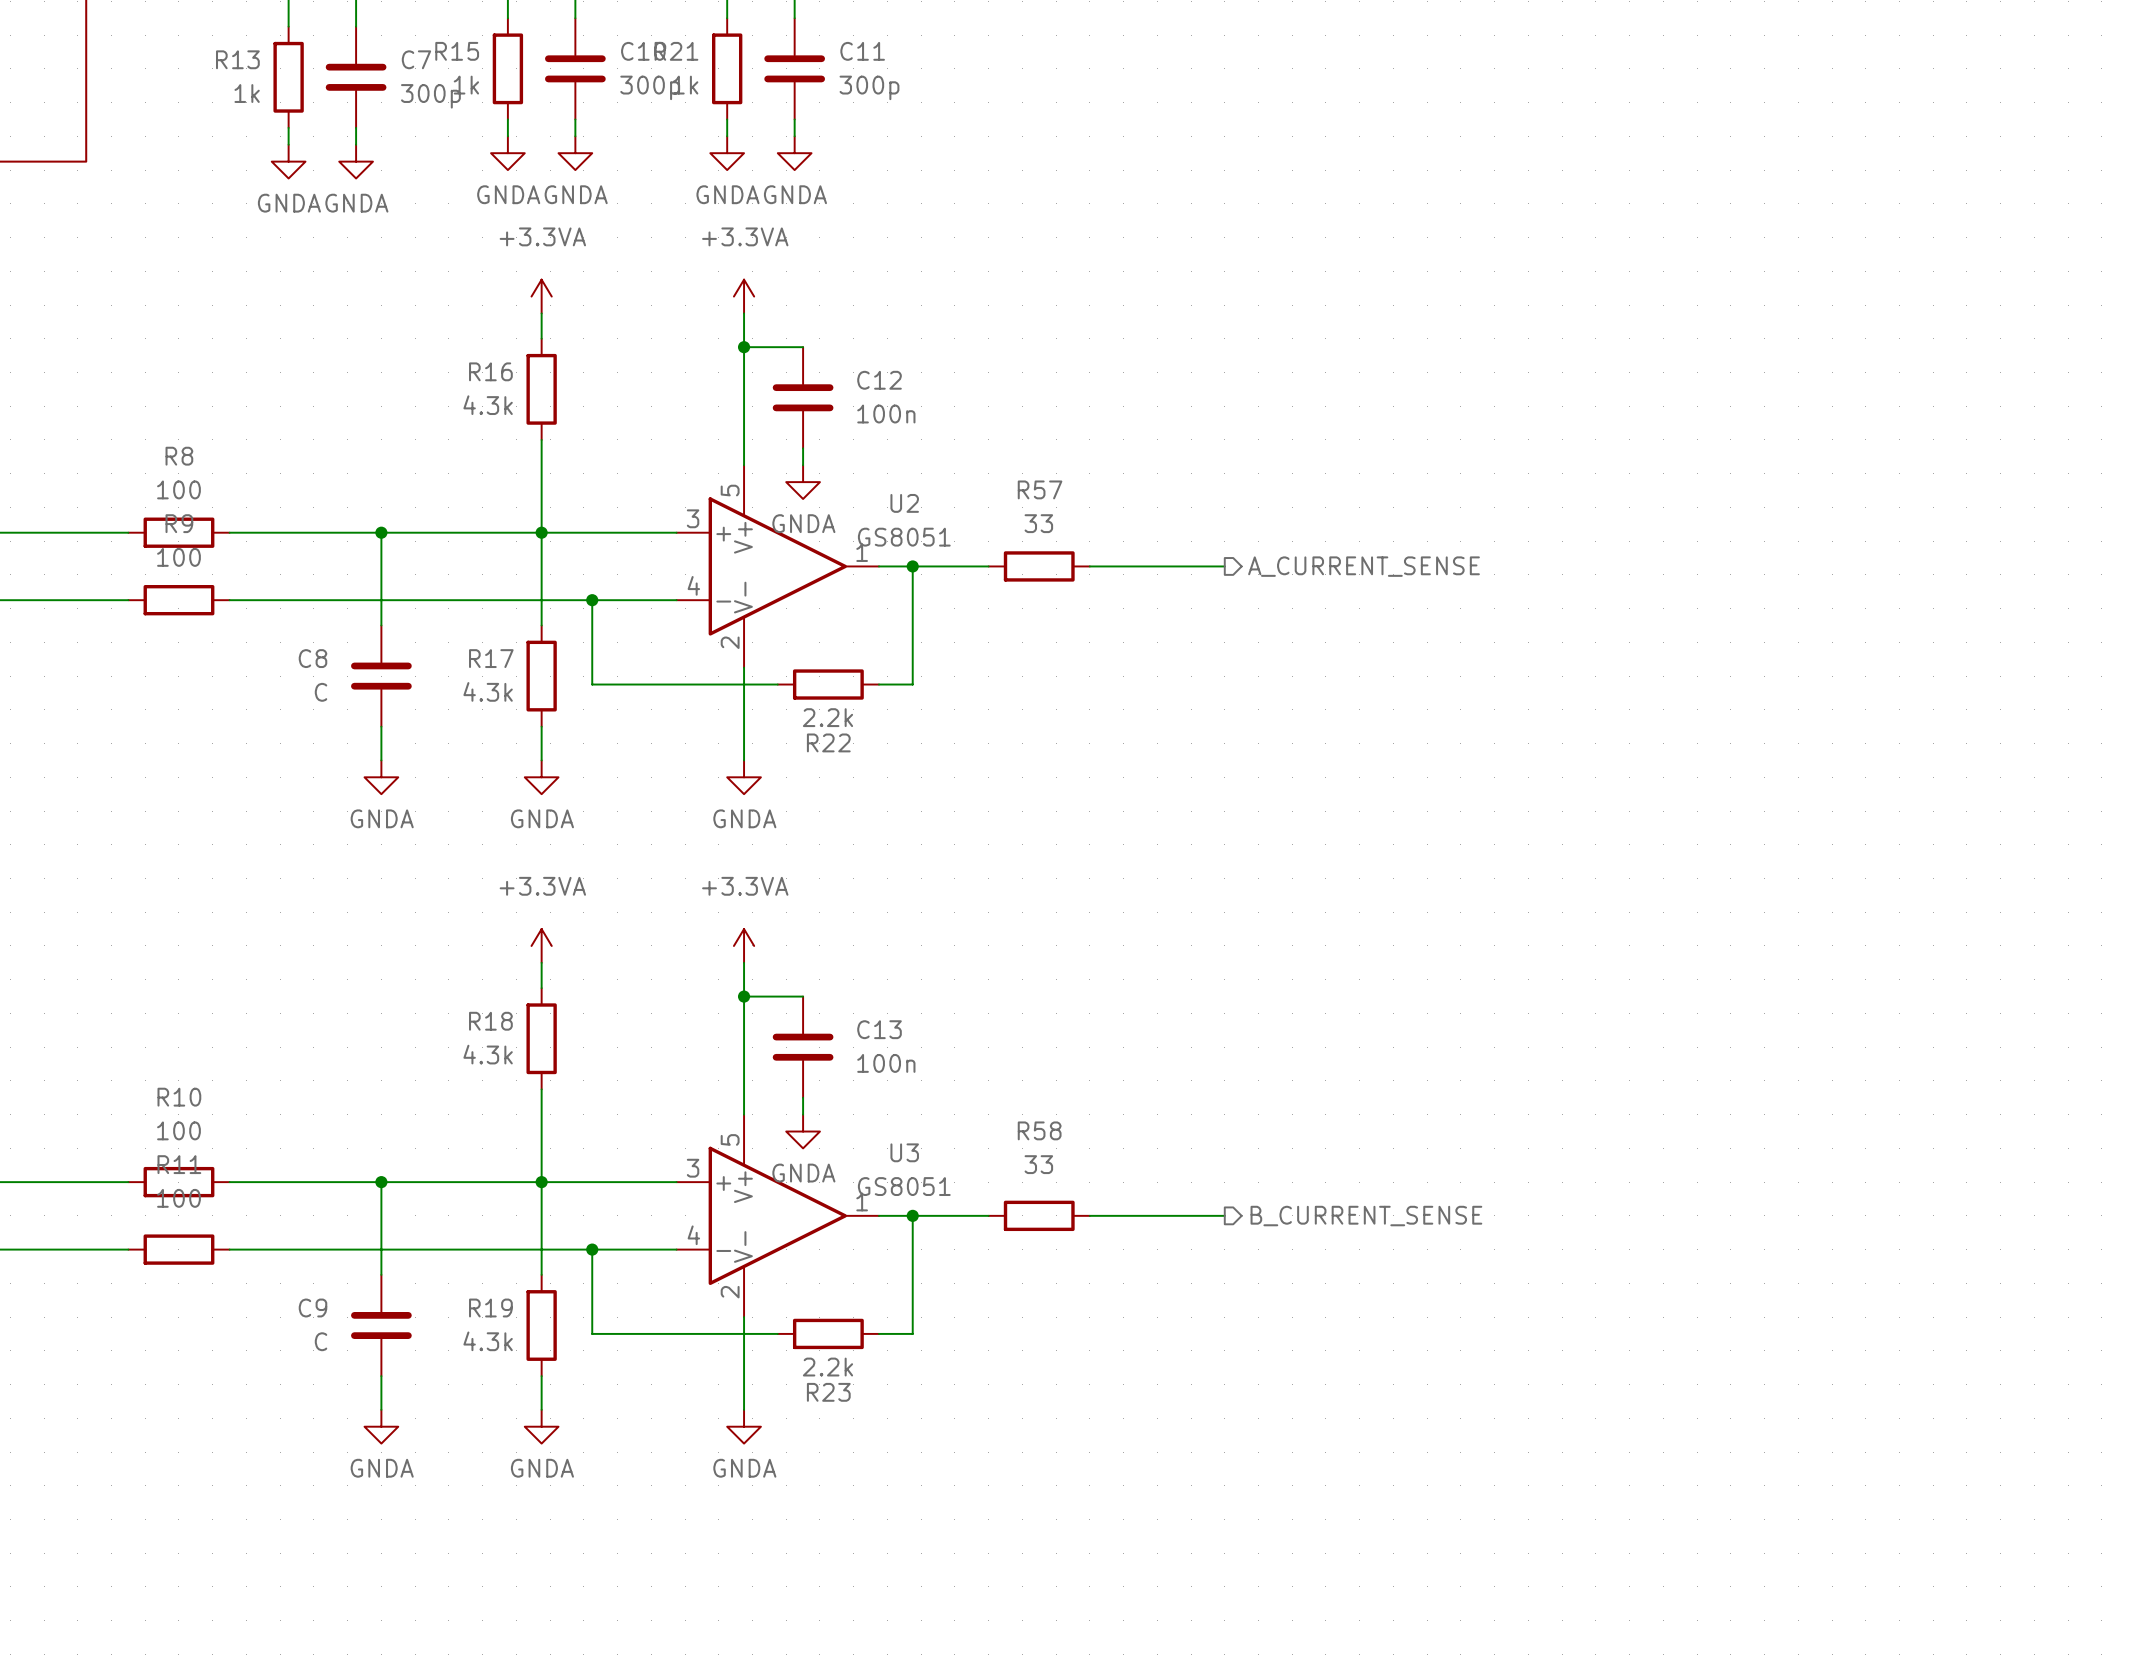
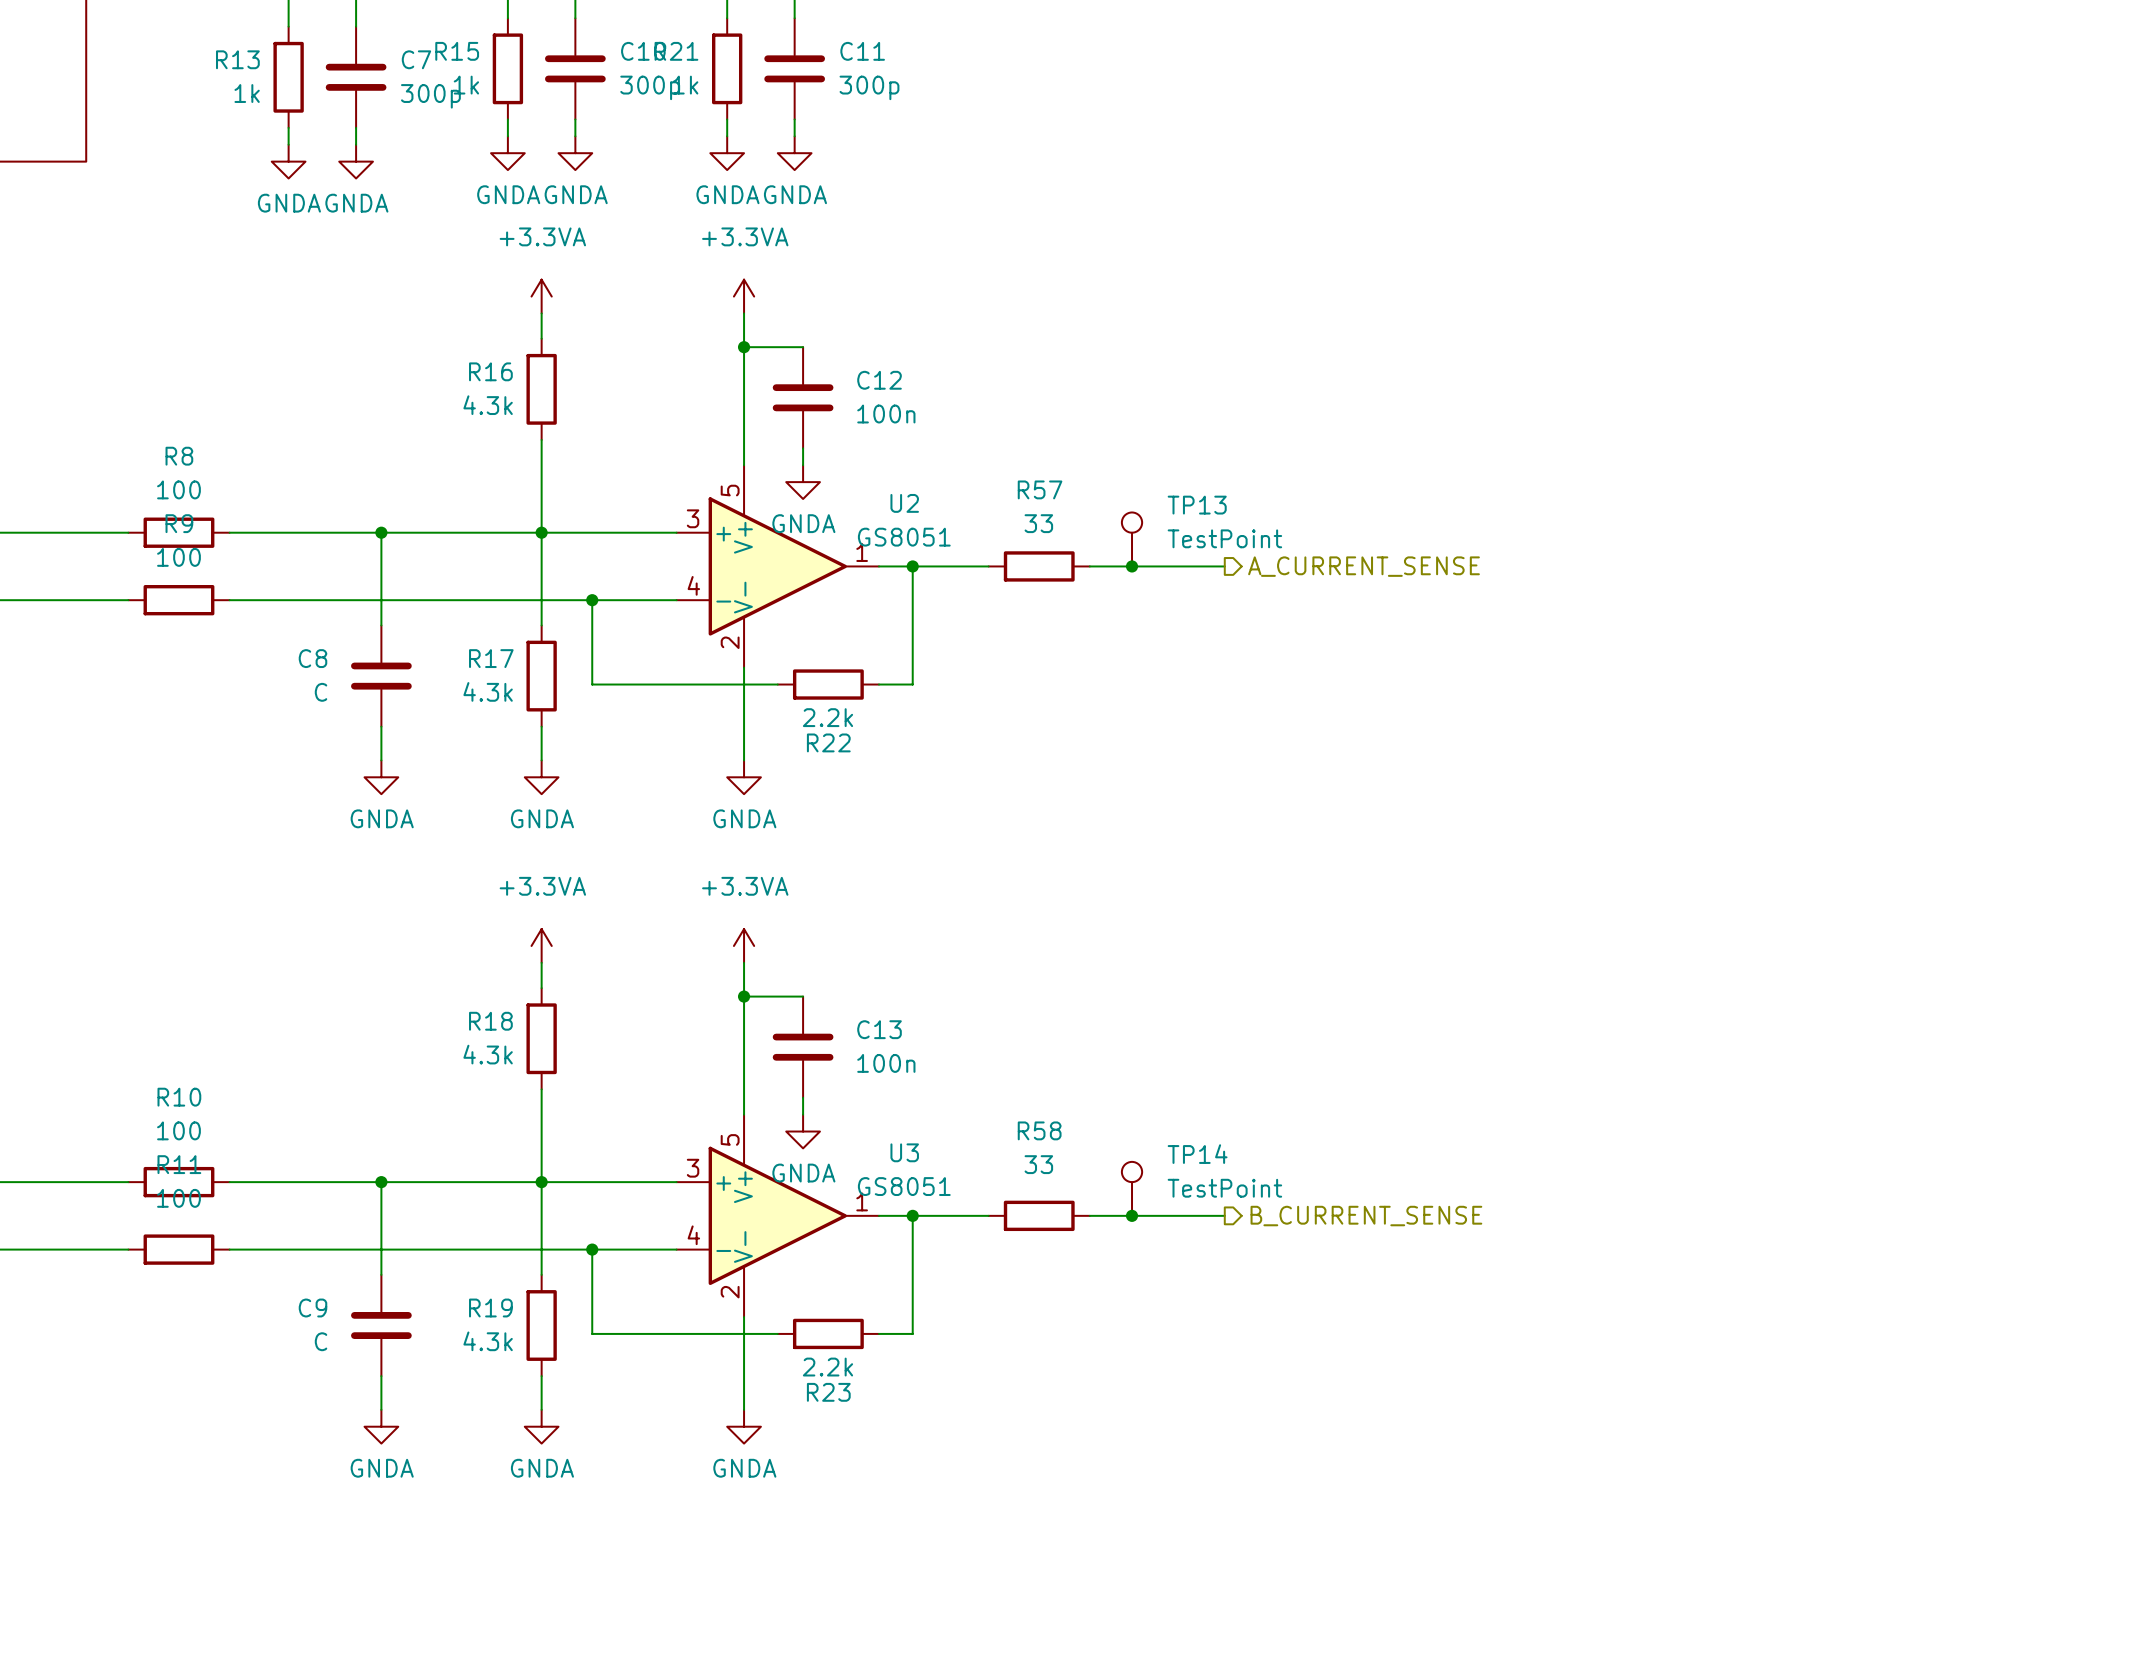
TP13: none -> TestPoint (1132, 539)
junction: none -> (1132, 566)
TP14: none -> TestPoint (1132, 1188)
junction: none -> (1132, 1215)

